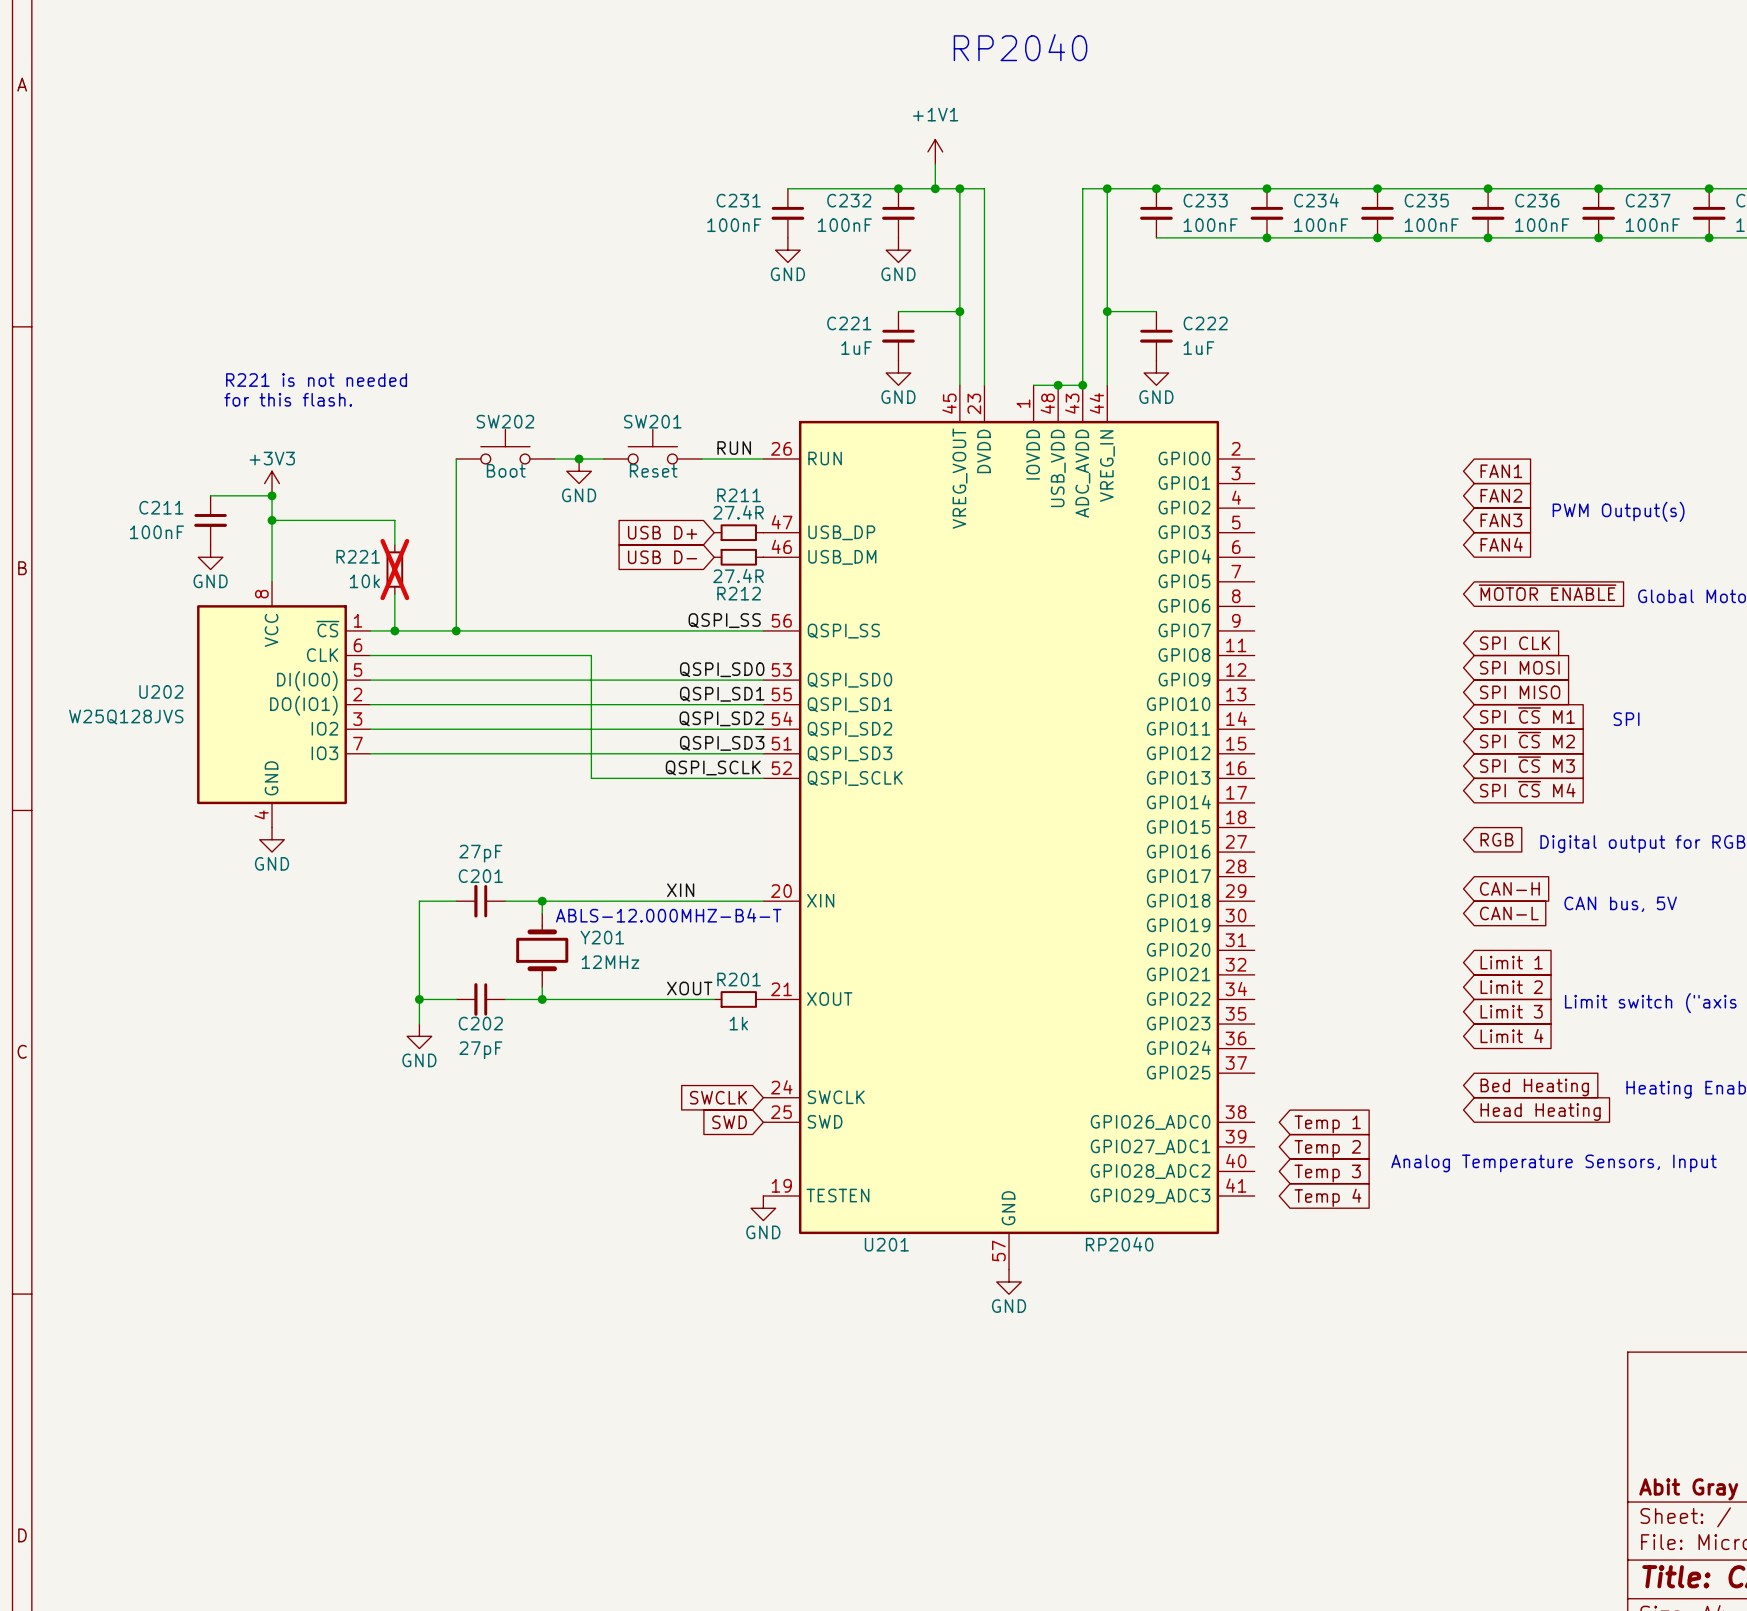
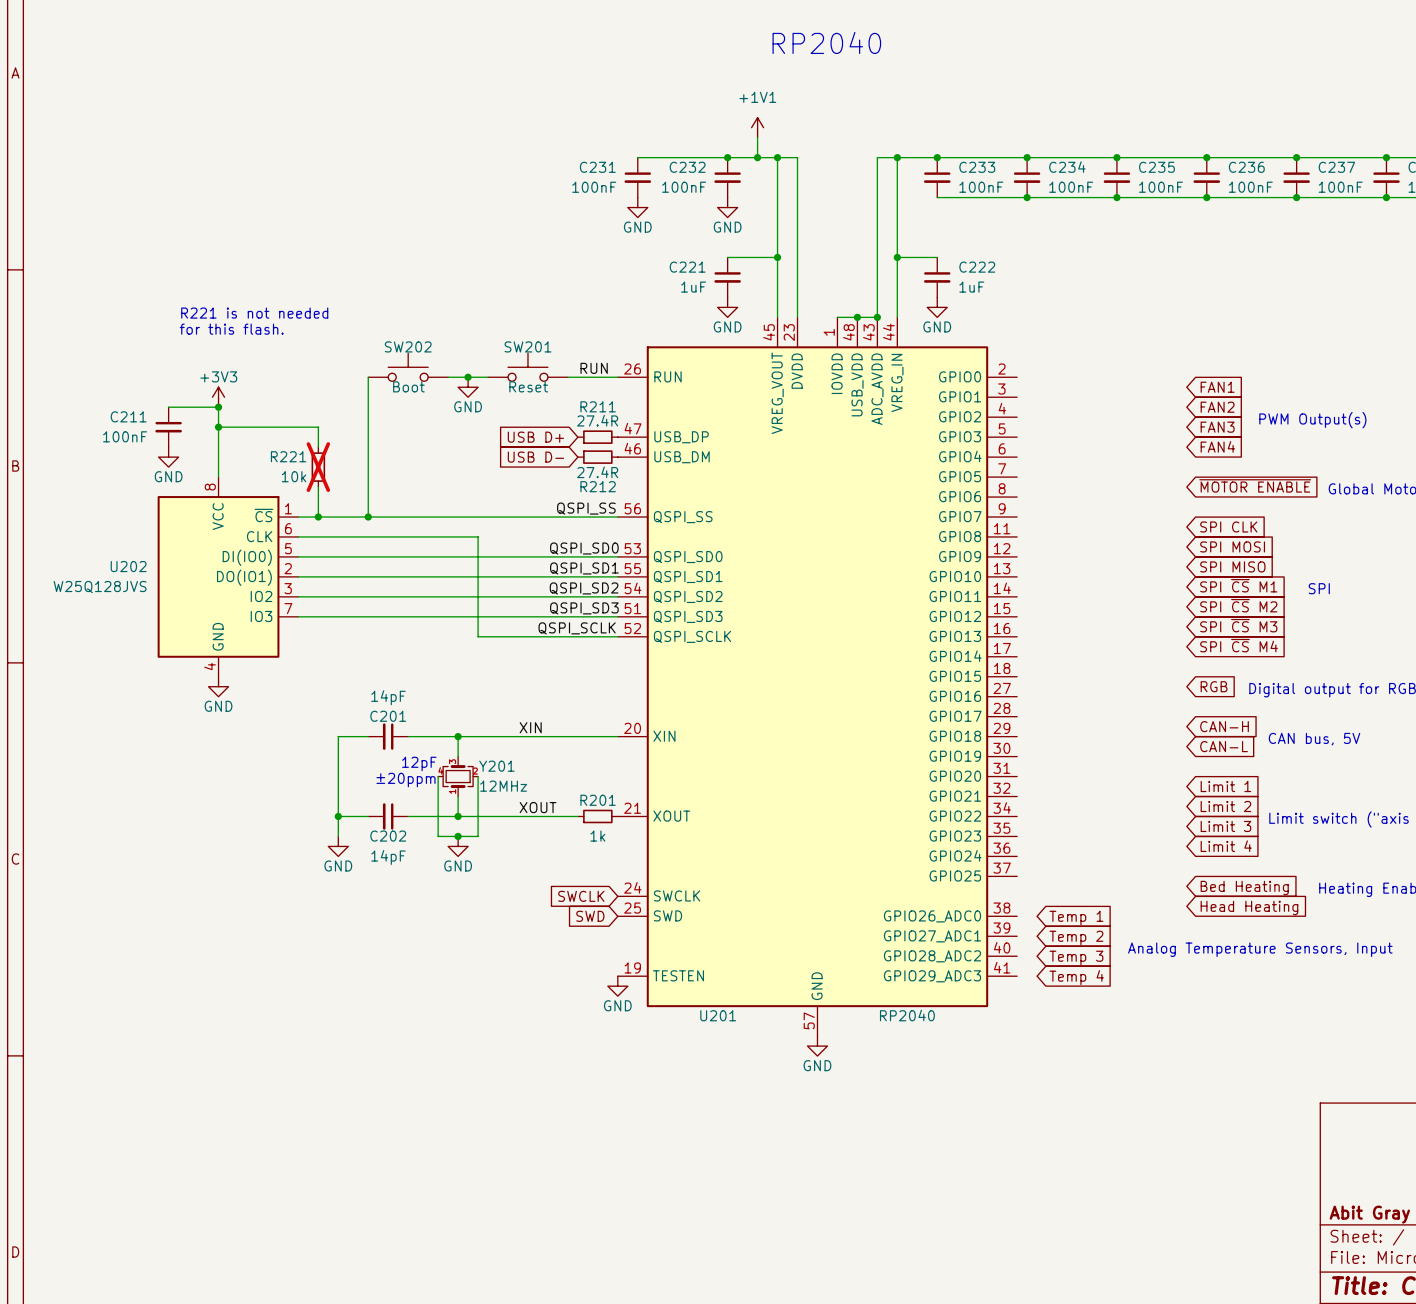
C201 value: 27pF (480, 853) -> 14pF (388, 697)
label position: XIN (680, 890) -> XIN (530, 727)
wire: (542, 901) (542, 913) -> none
junction position: (542, 901) -> (458, 736)
wire: none -> (458, 736) (458, 756)
Y201 symbol: [516, 913, 569, 988] -> [438, 756, 479, 797]
text: ABLS-12.000MHZ-B4-T (668, 915) -> none
text: none -> 12pF (419, 763)
wire: none -> (478, 776) (478, 836) (438, 836) (438, 816)
text: none -> ±20ppm (405, 780)
wire: none -> (458, 796) (458, 816)
label position: XOUT (689, 988) -> XOUT (538, 807)
junction: (542, 999) -> none
junction: none -> (458, 816)
junction: none -> (458, 836)
power symbol: none -> GND (458, 846)
C202 value: 27pF (480, 1050) -> 14pF (388, 857)

